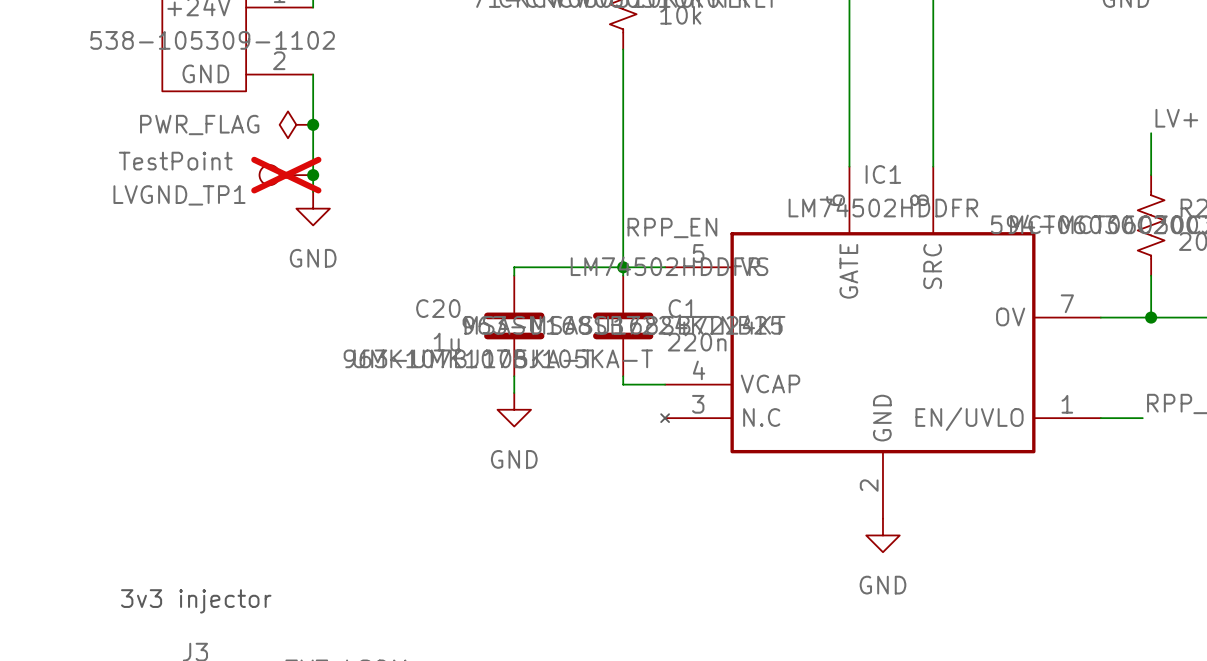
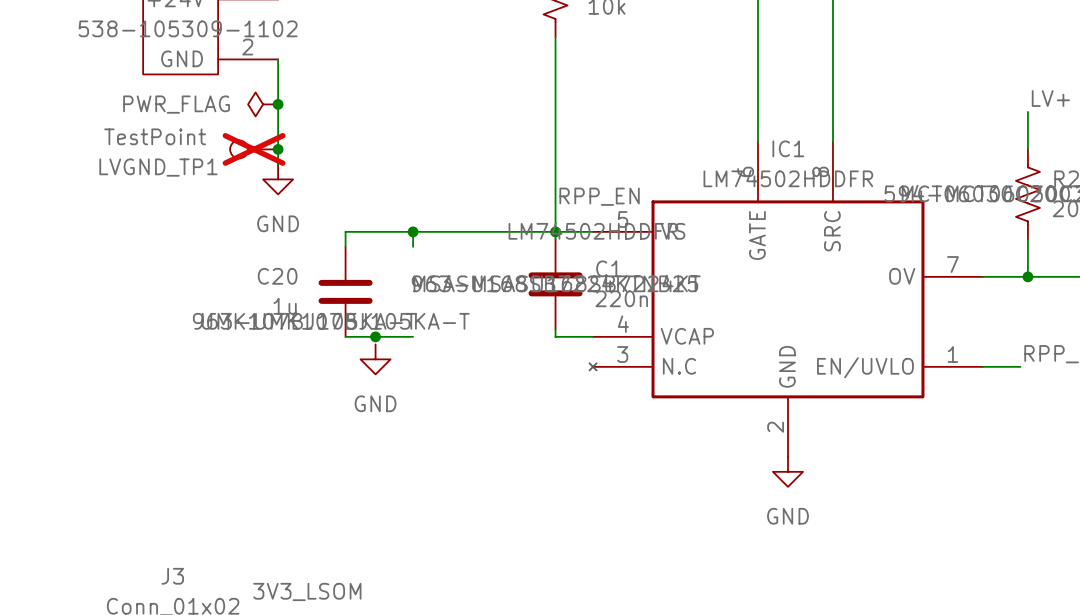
junction: none -> (413, 231)
wire: (514, 267) (514, 275) -> (458, 231) (345, 231) (345, 246)
C20 position: (514, 325) -> (345, 291)
wire: (514, 376) (514, 392) -> (413, 231) (413, 246)
wire: none -> (345, 336) (413, 336)
junction: none -> (375, 336)
power symbol position: GND (514, 409) -> GND (375, 359)
text: 3v3 injector (196, 601) -> none

